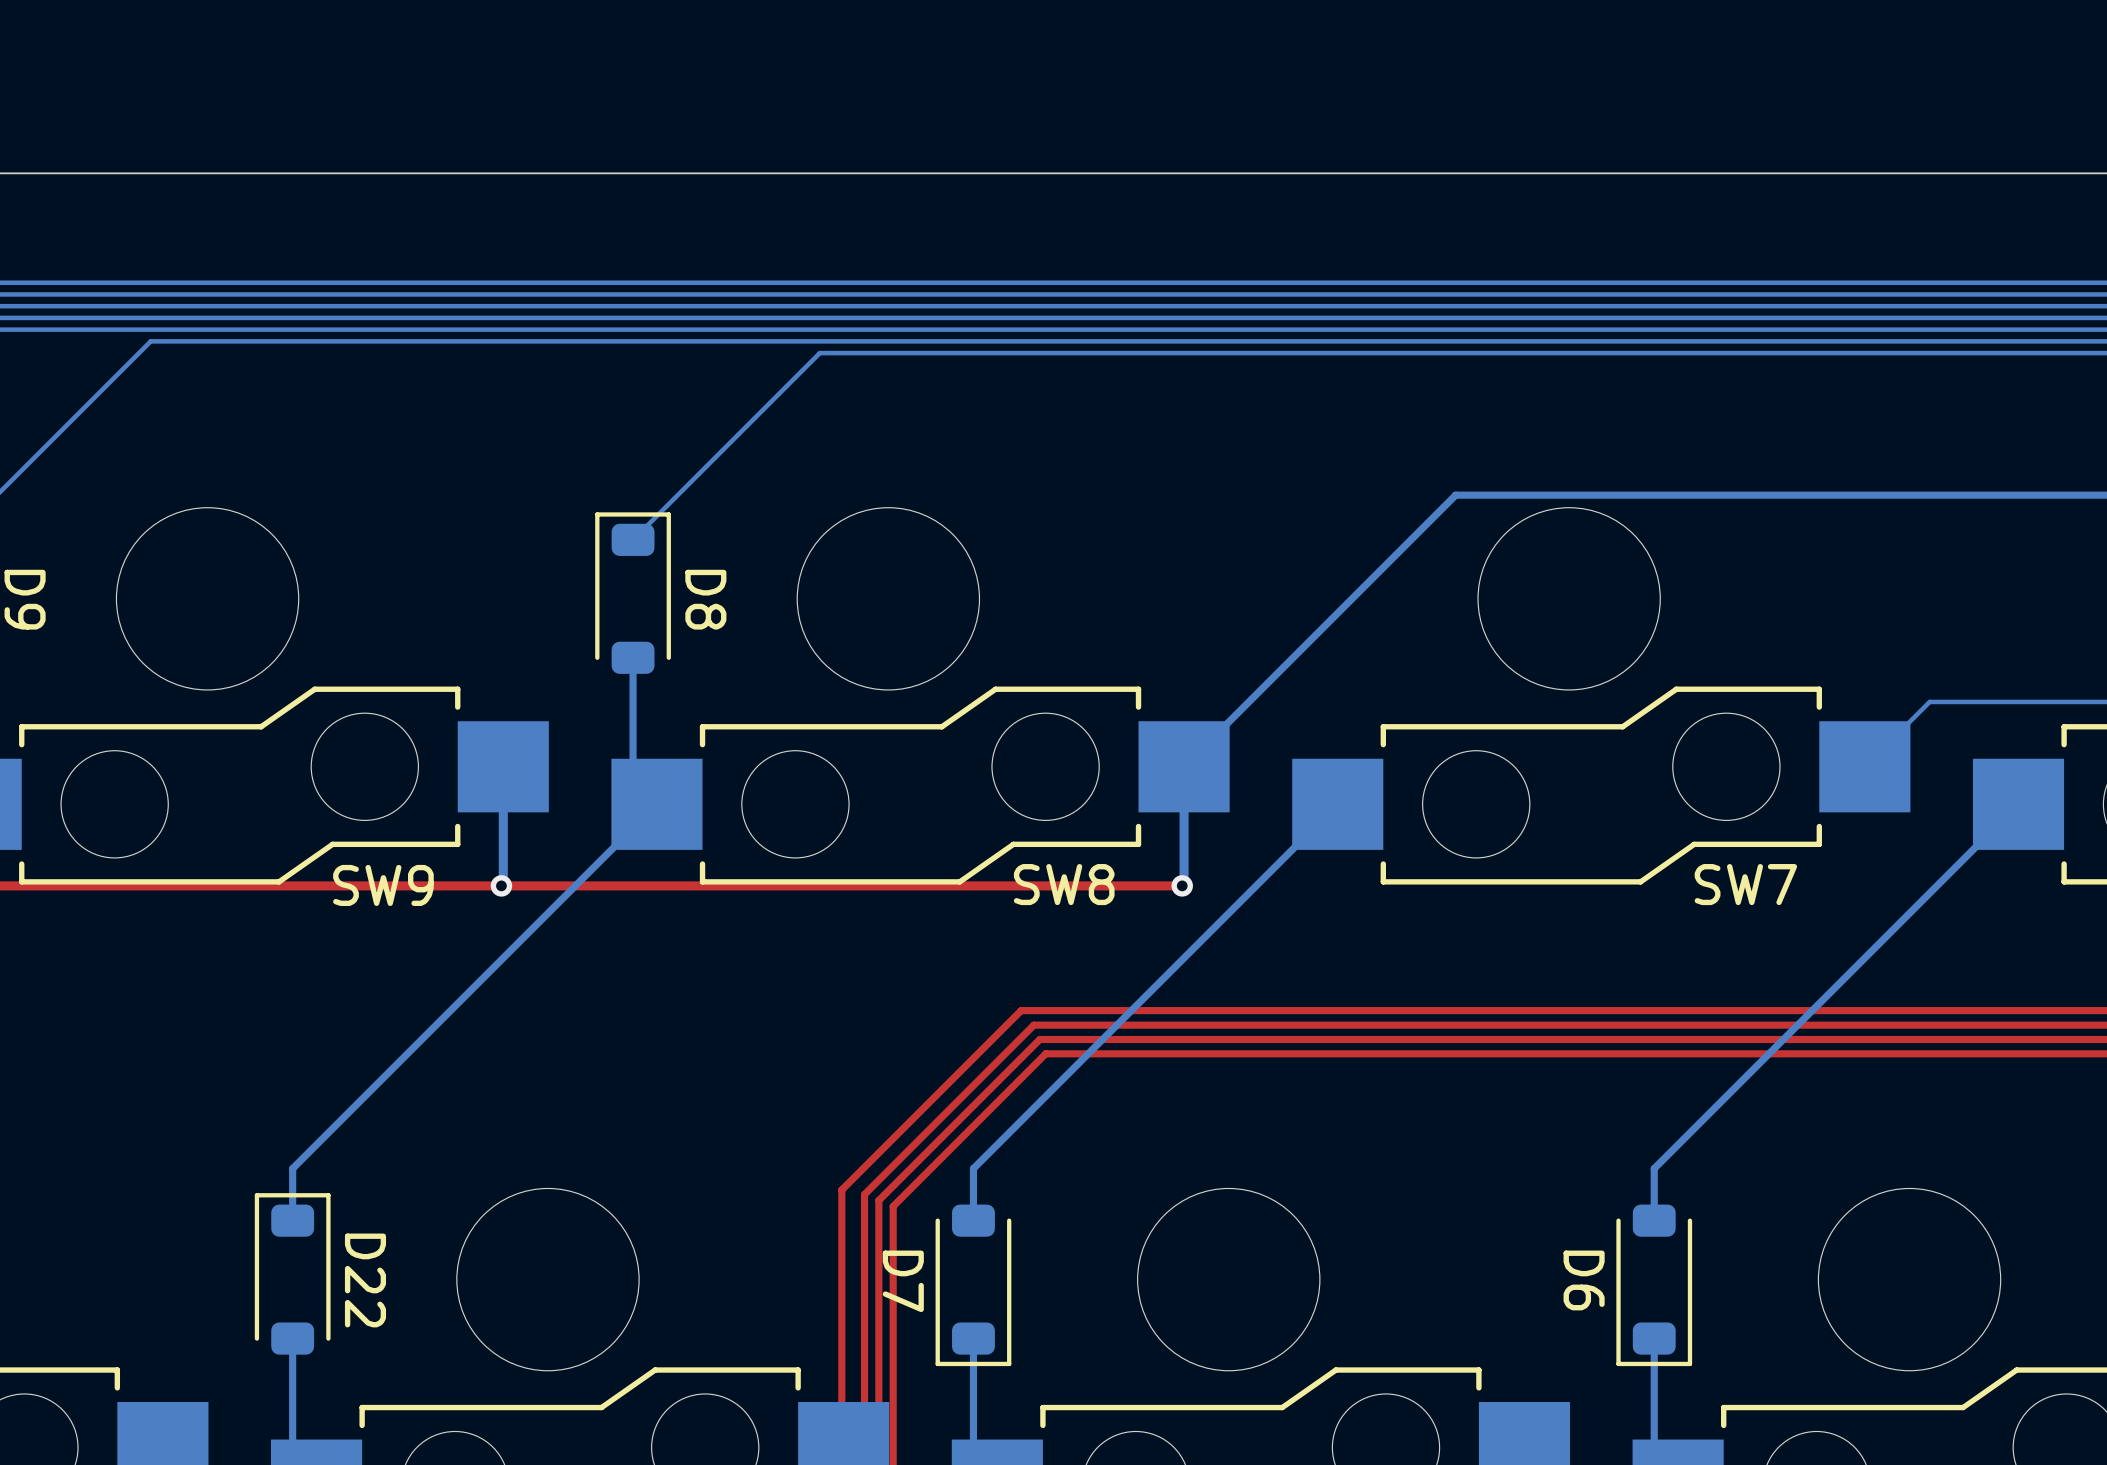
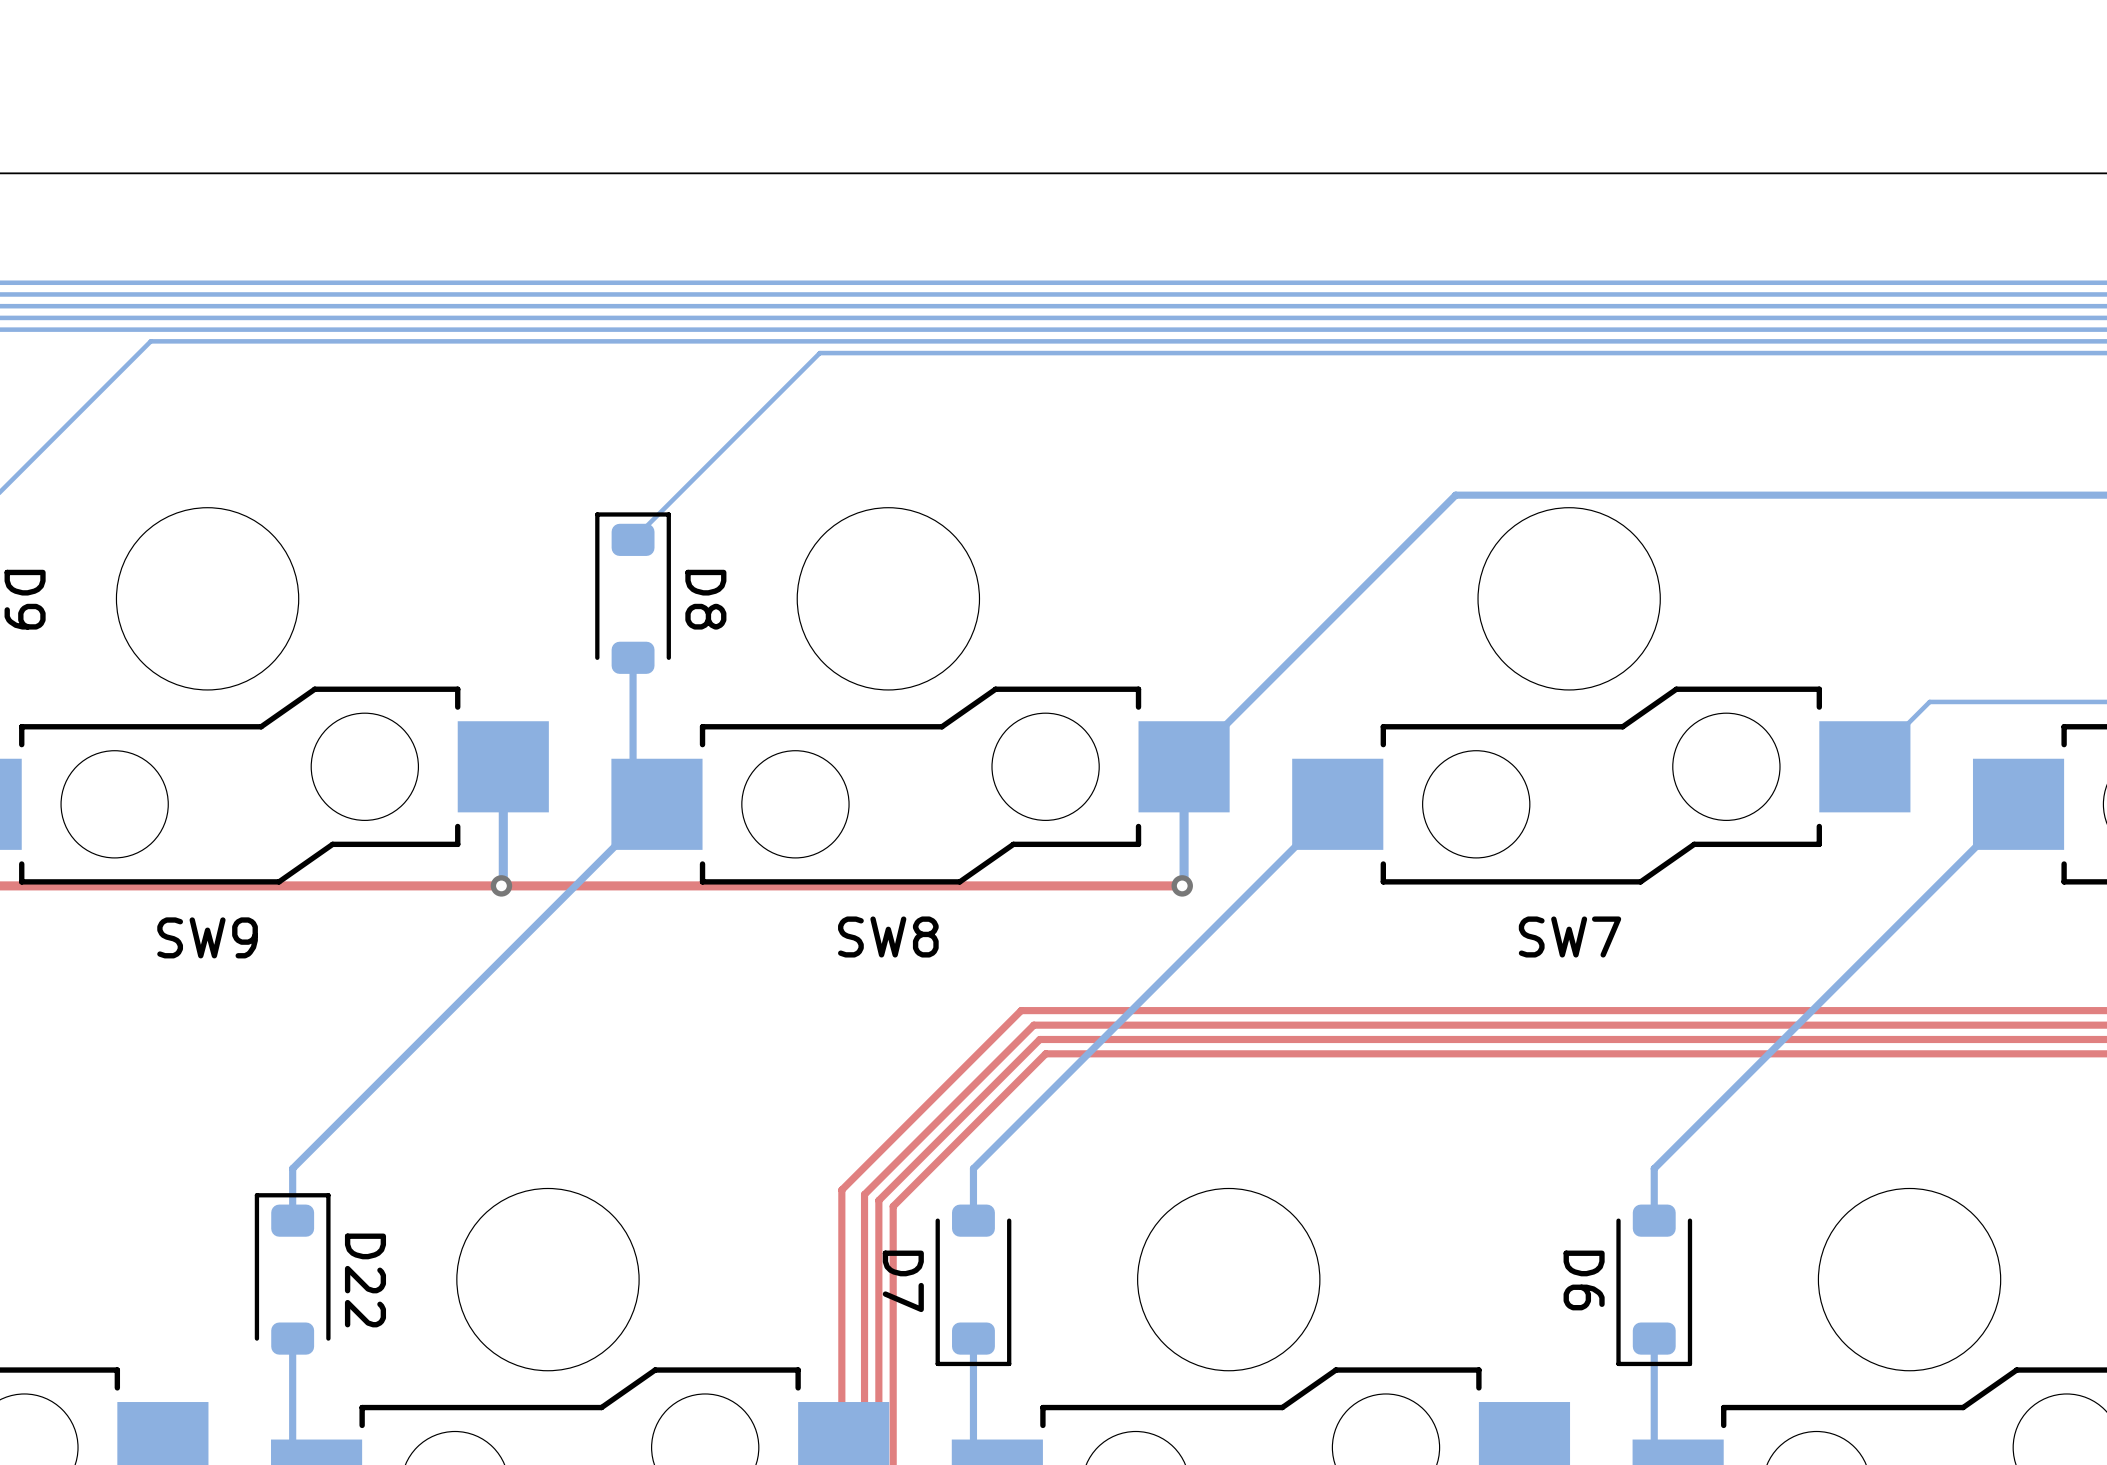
SW8 name position: SW8 (1064, 884) -> SW8 (888, 936)
SW7 name position: SW7 (1745, 884) -> SW7 (1569, 936)
SW9 name position: SW9 (383, 885) -> SW9 (207, 937)

